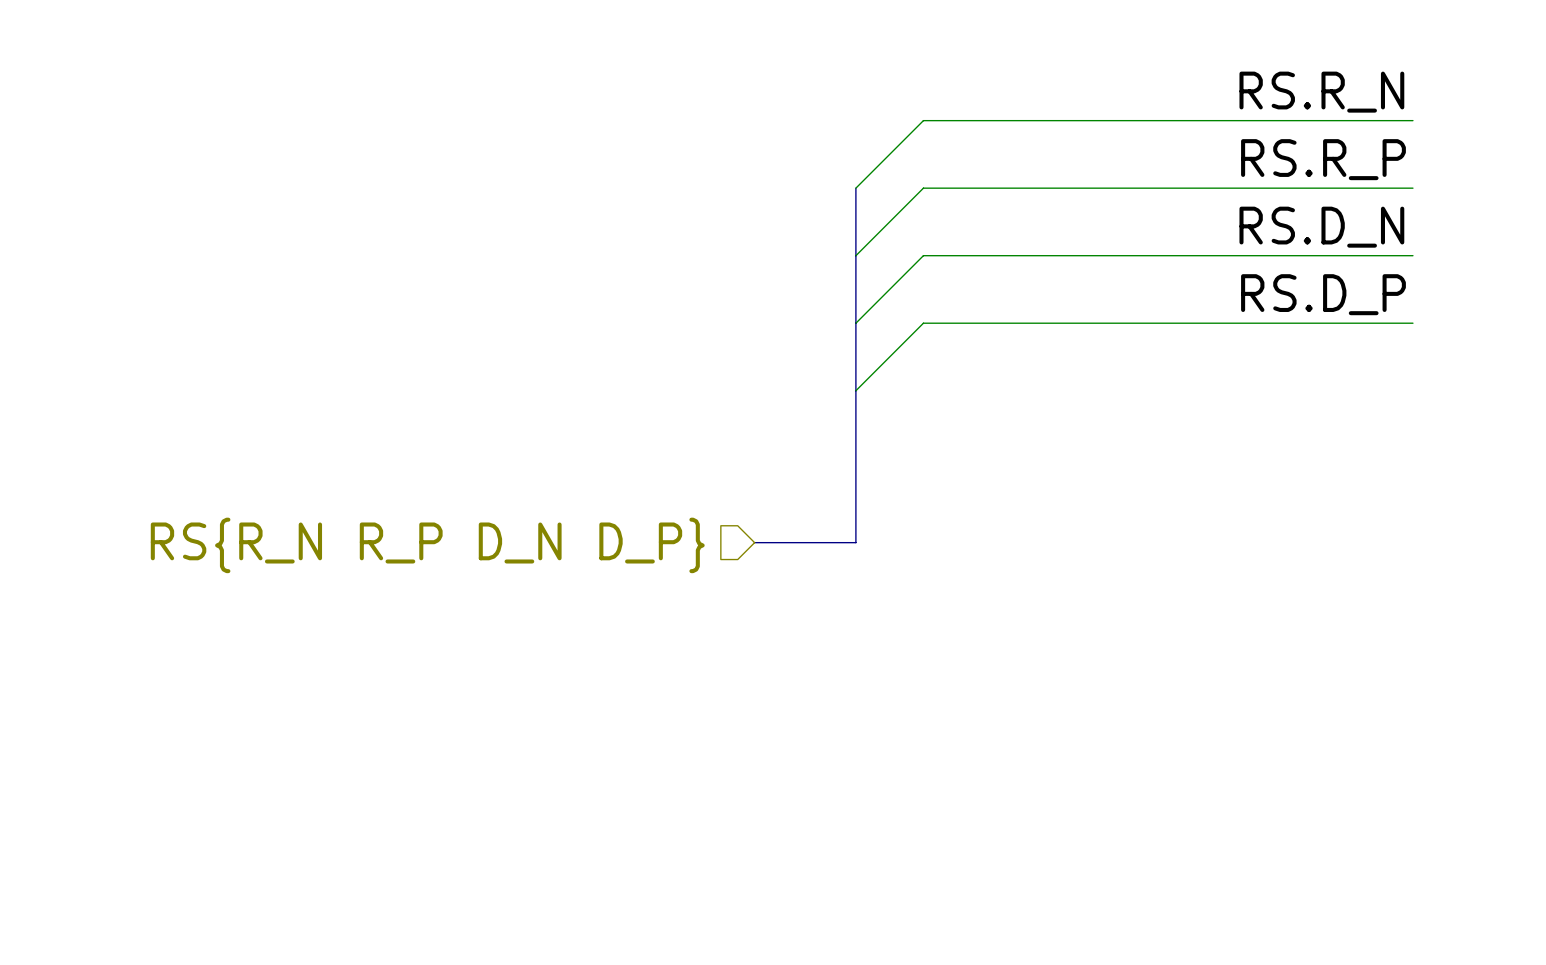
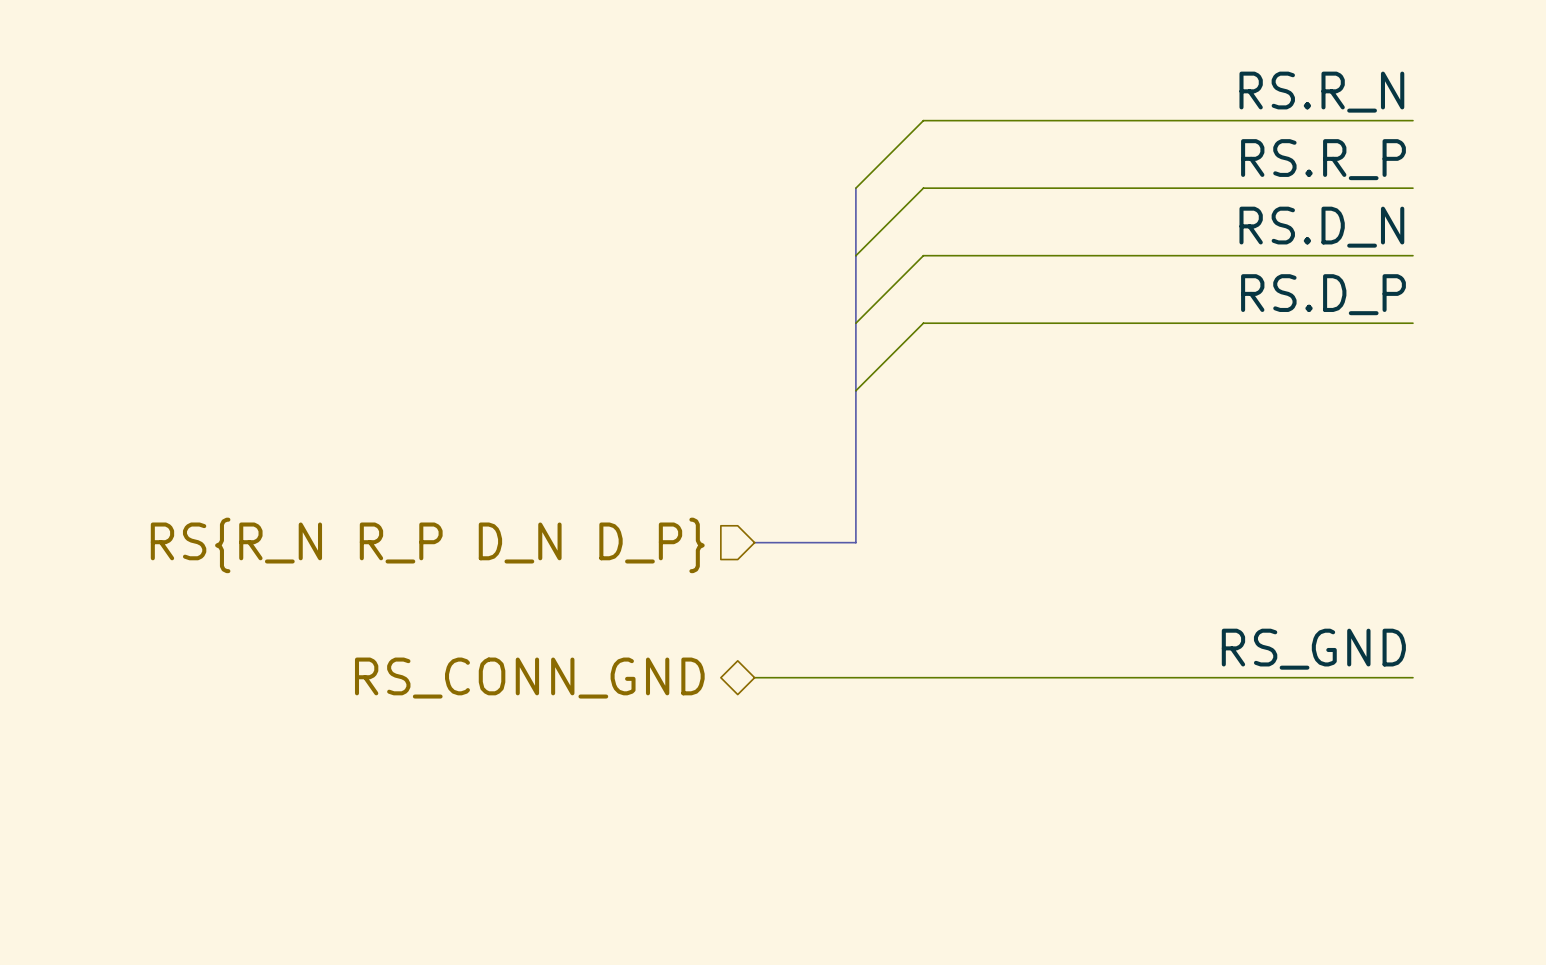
label: none -> RS_GND (1313, 649)
wire: none -> (754, 677) (1412, 677)
hierarchical label: none -> RS_CONN_GND (529, 678)

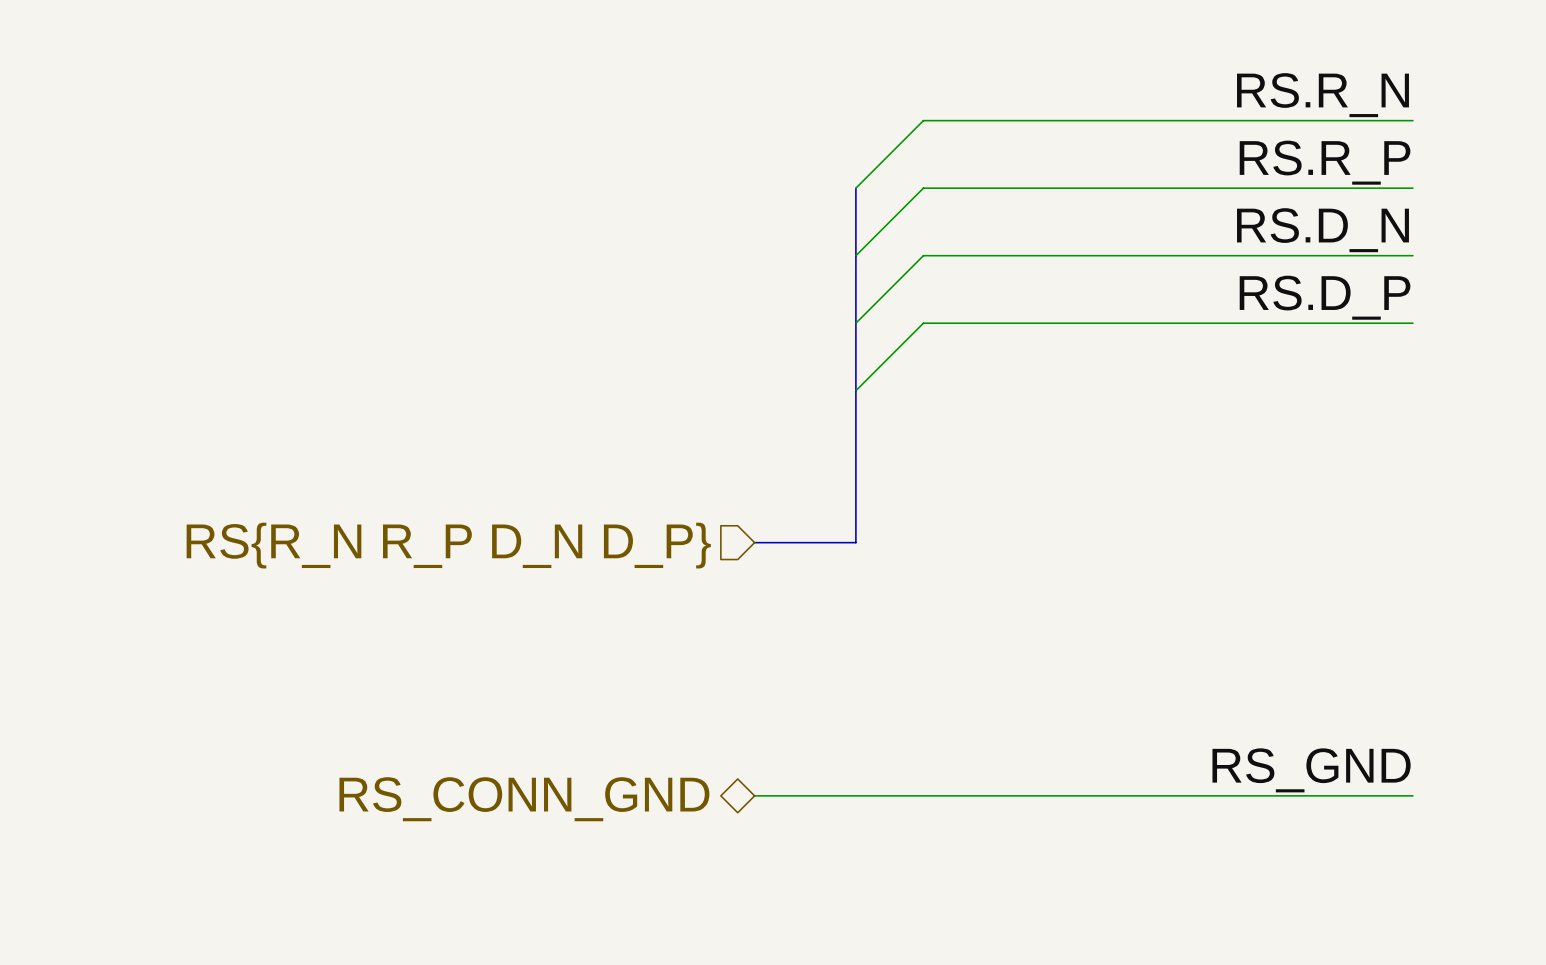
label position: RS_GND (1313, 649) -> RS_GND (1311, 770)
wire: (754, 677) (1412, 677) -> (754, 795) (1412, 795)
hierarchical label position: RS_CONN_GND (529, 678) -> RS_CONN_GND (524, 799)

